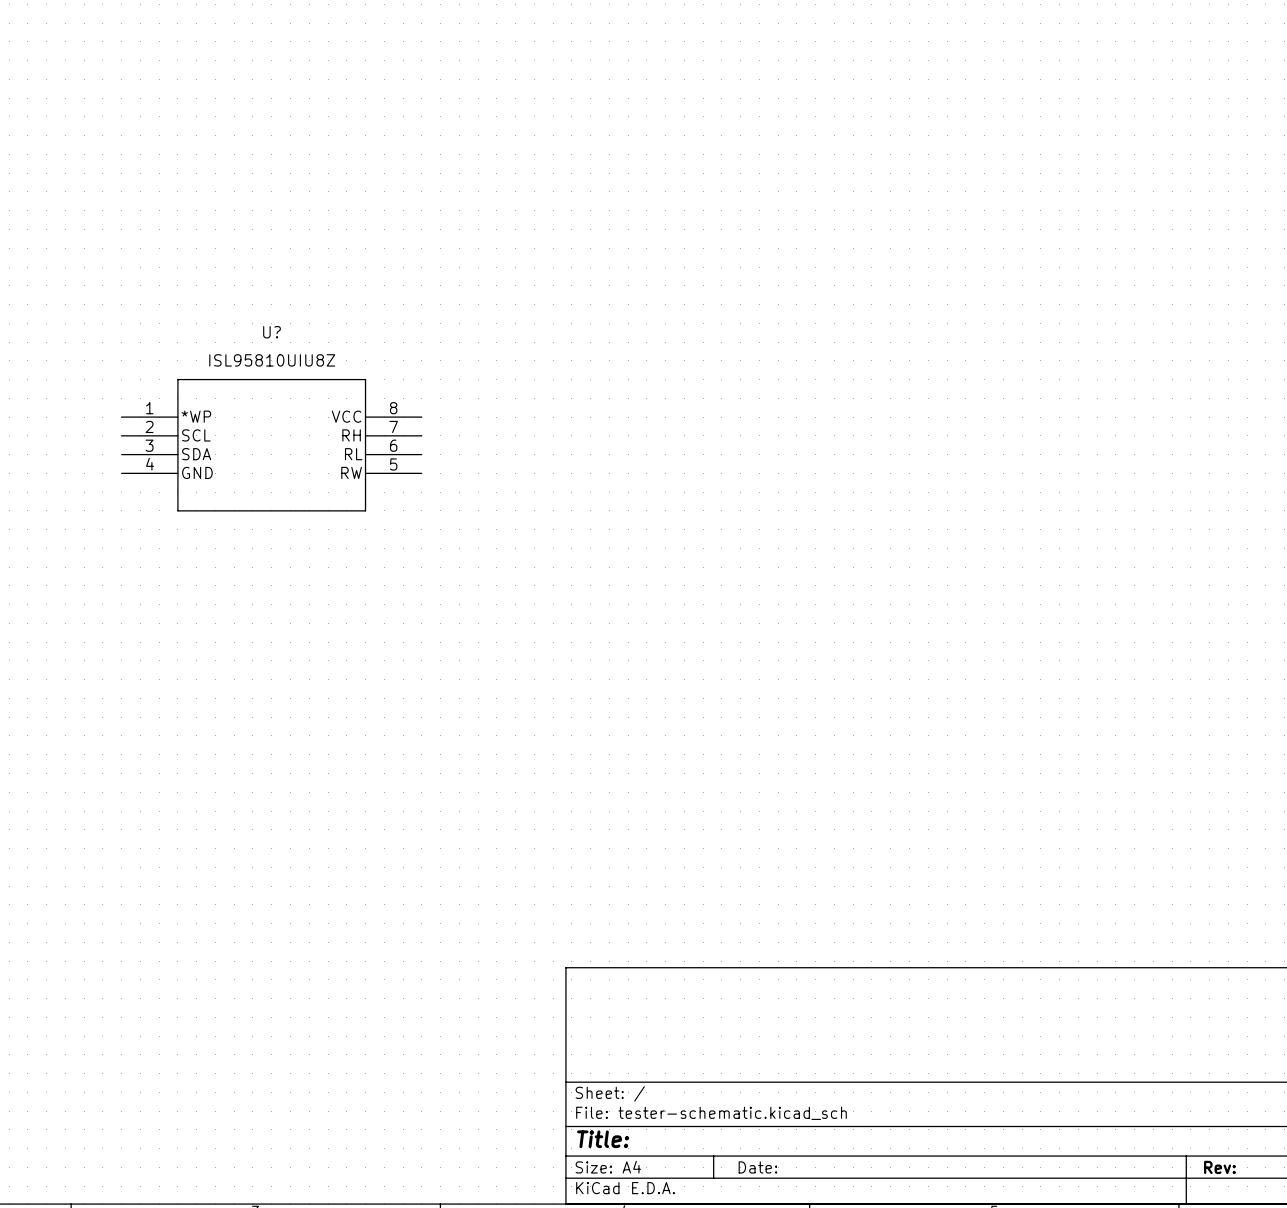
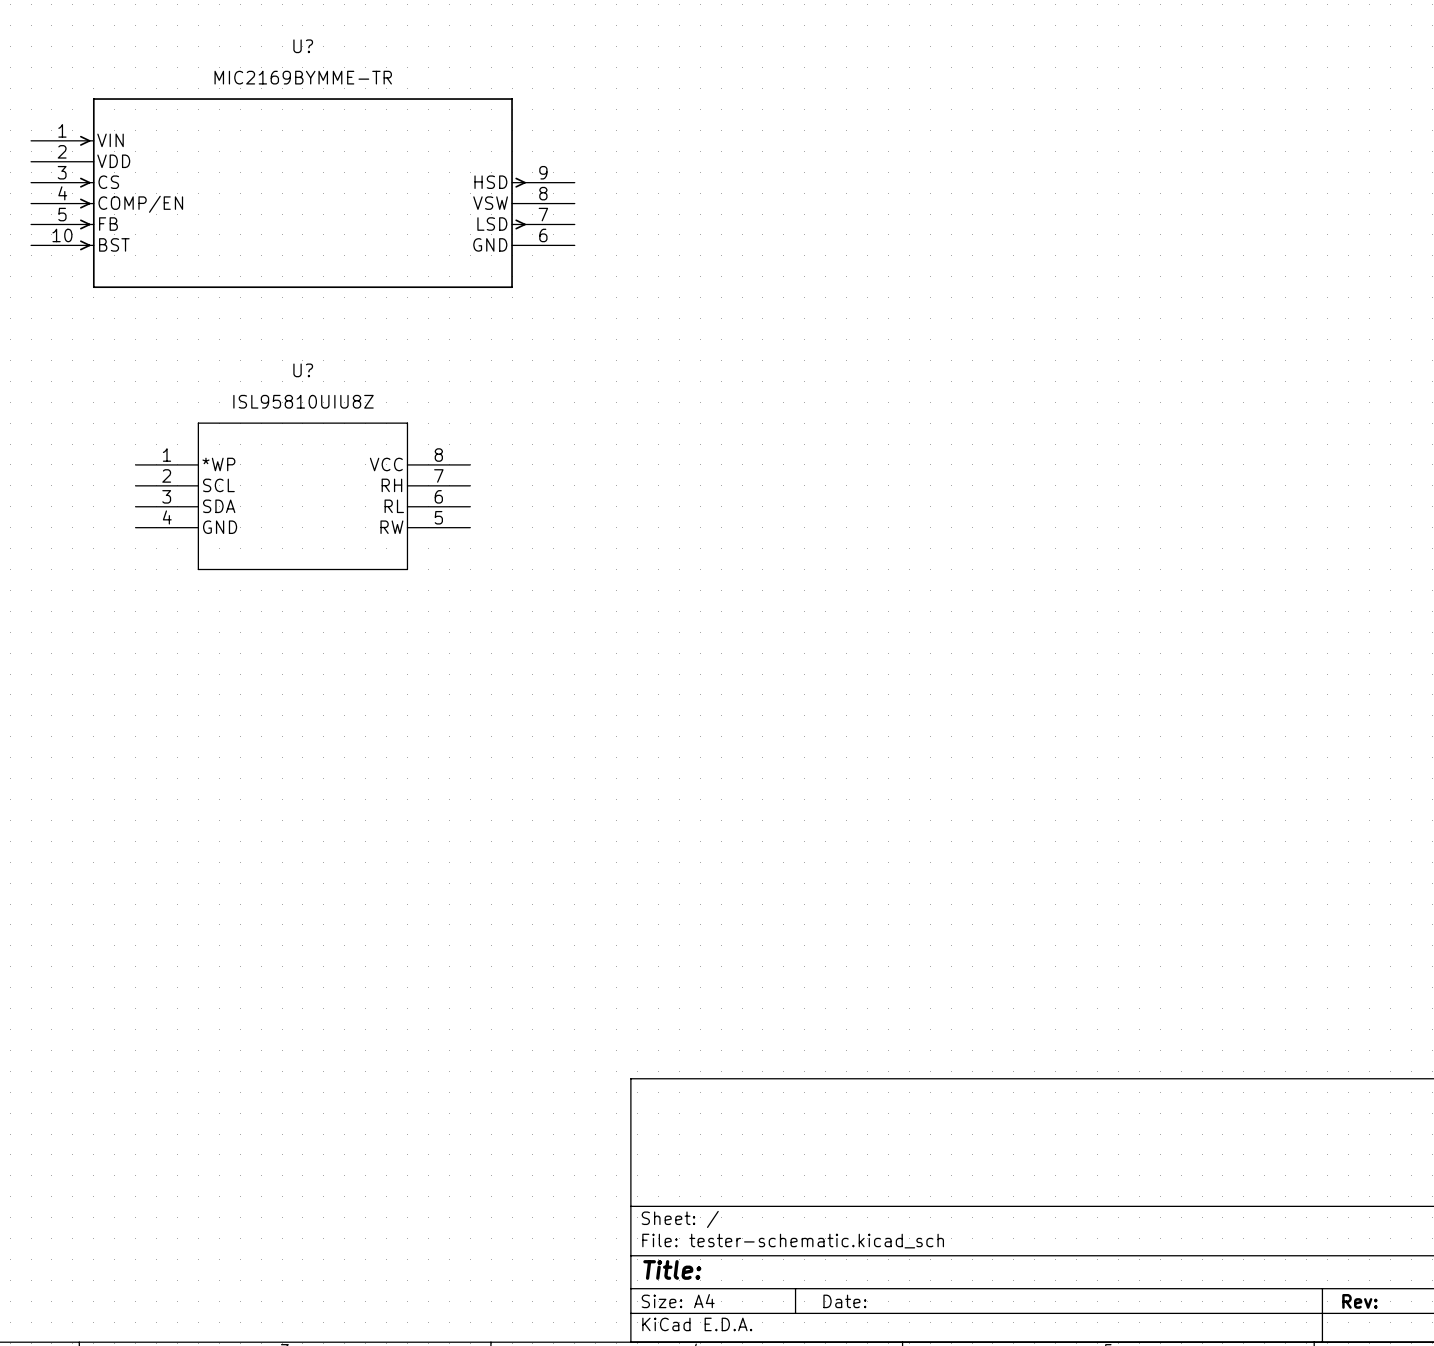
U?: none -> MIC2169BYMME-TR (302, 193)

